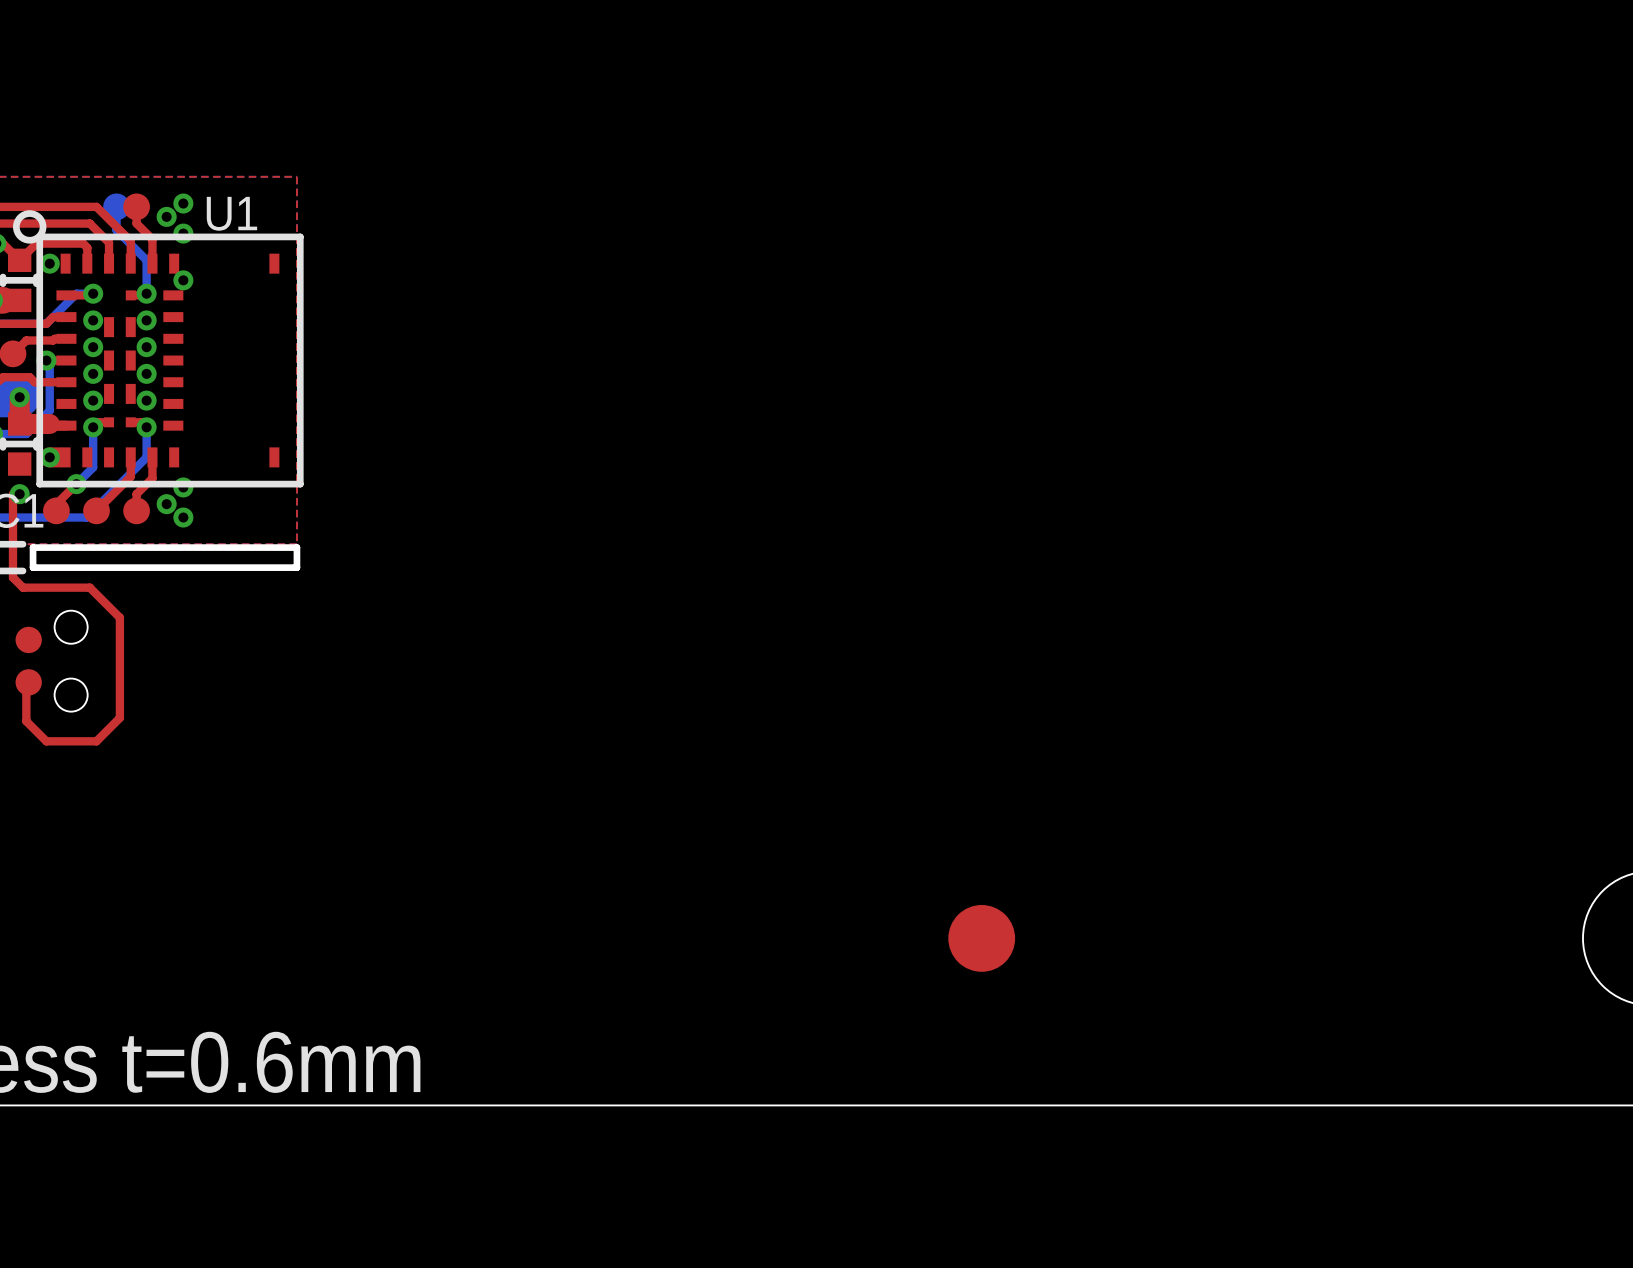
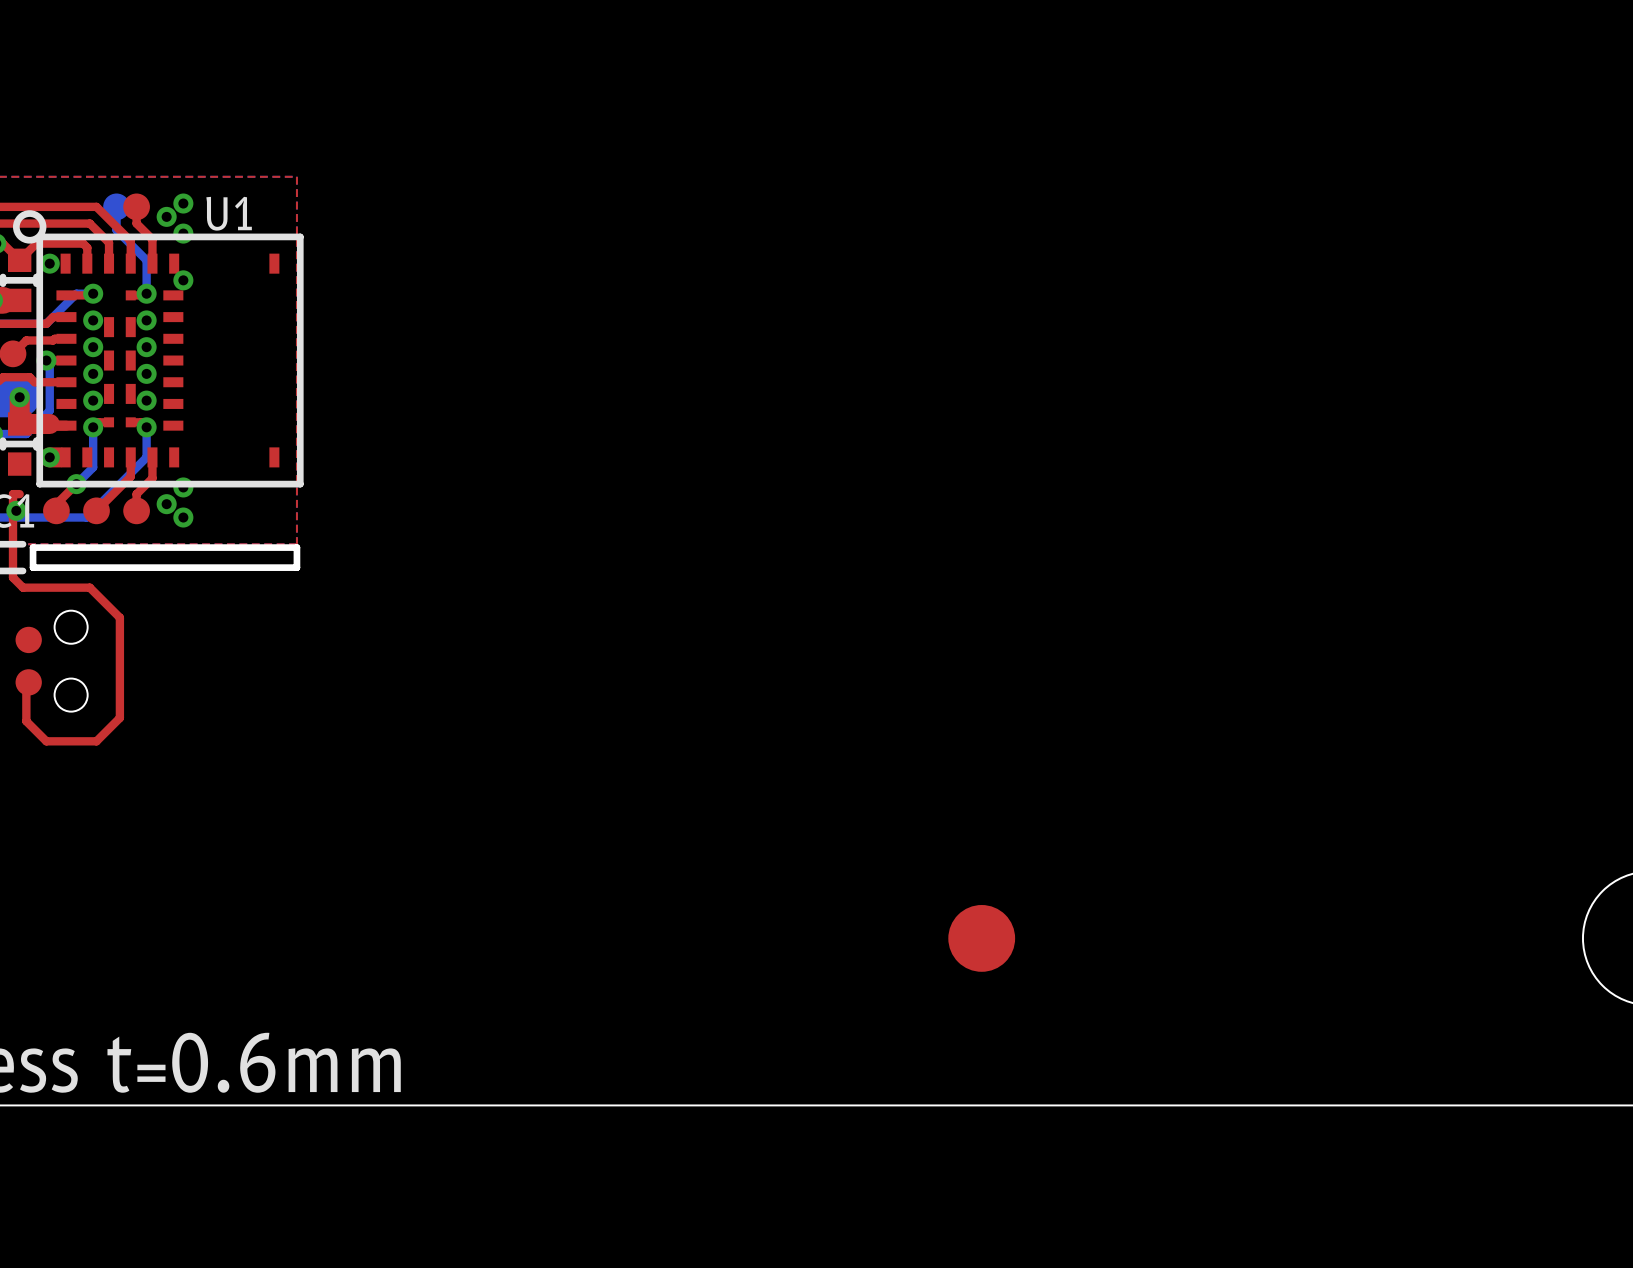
via position: (19, 494) -> (16, 510)

